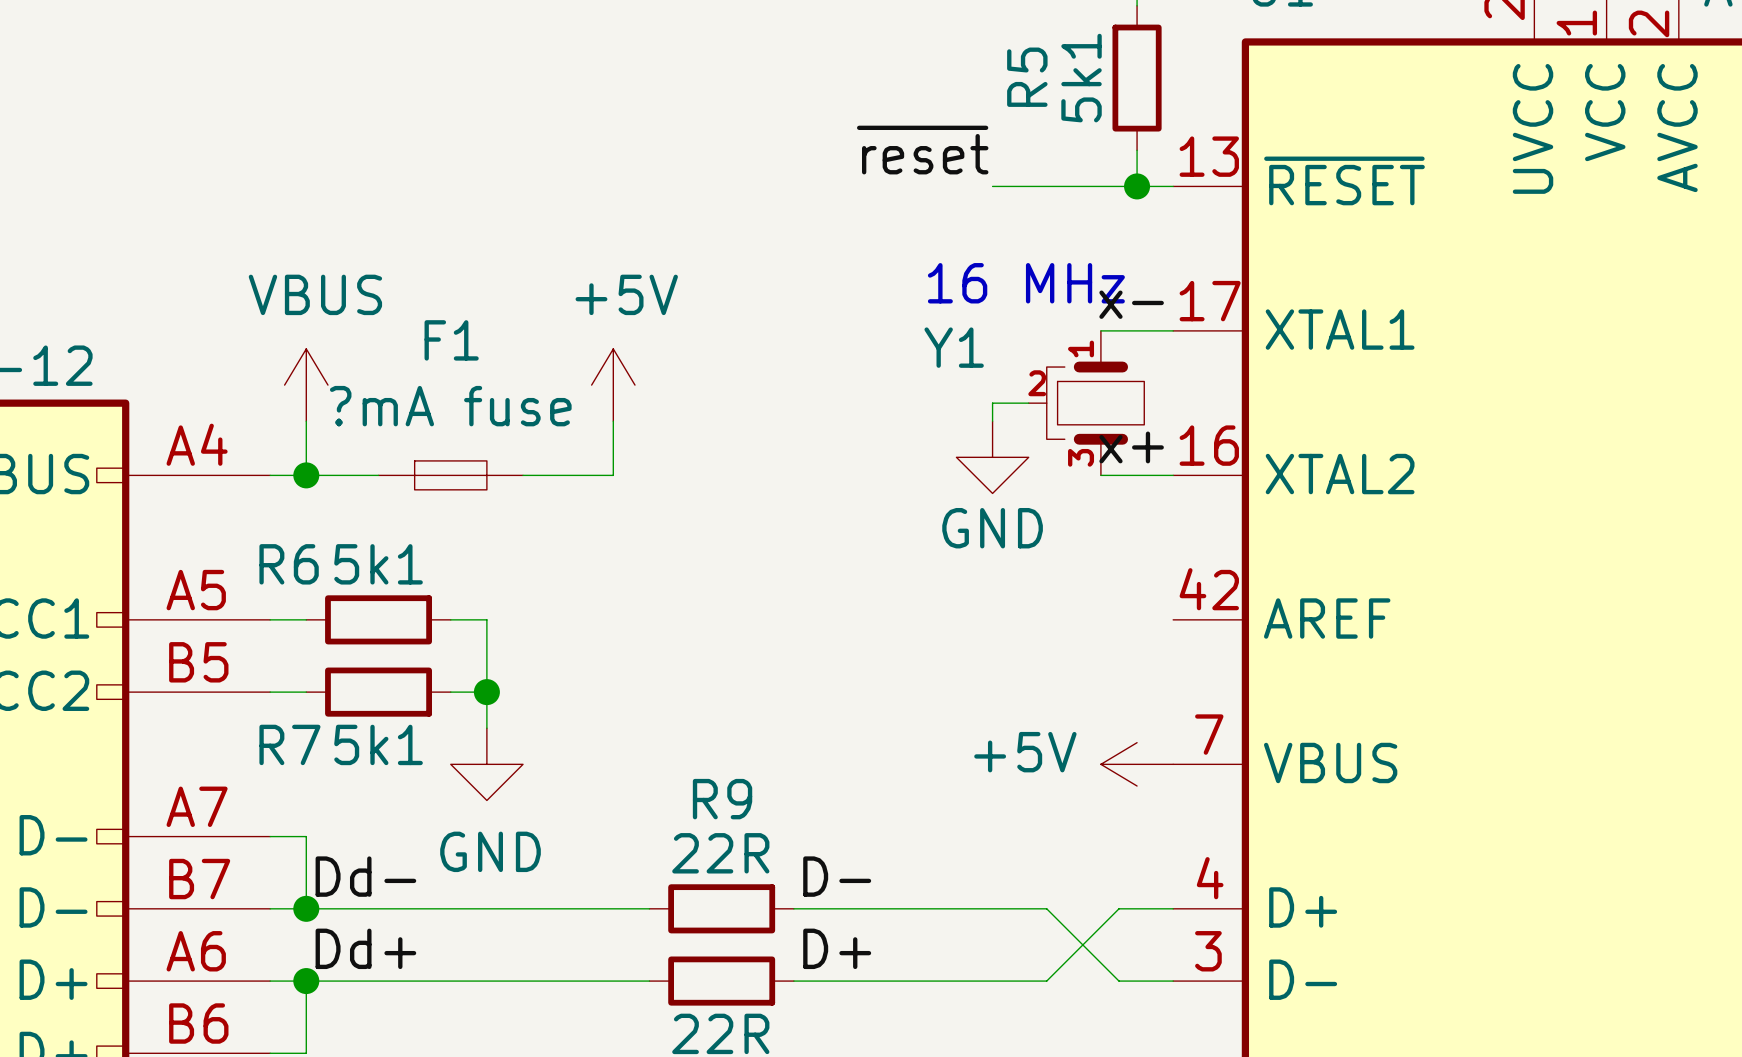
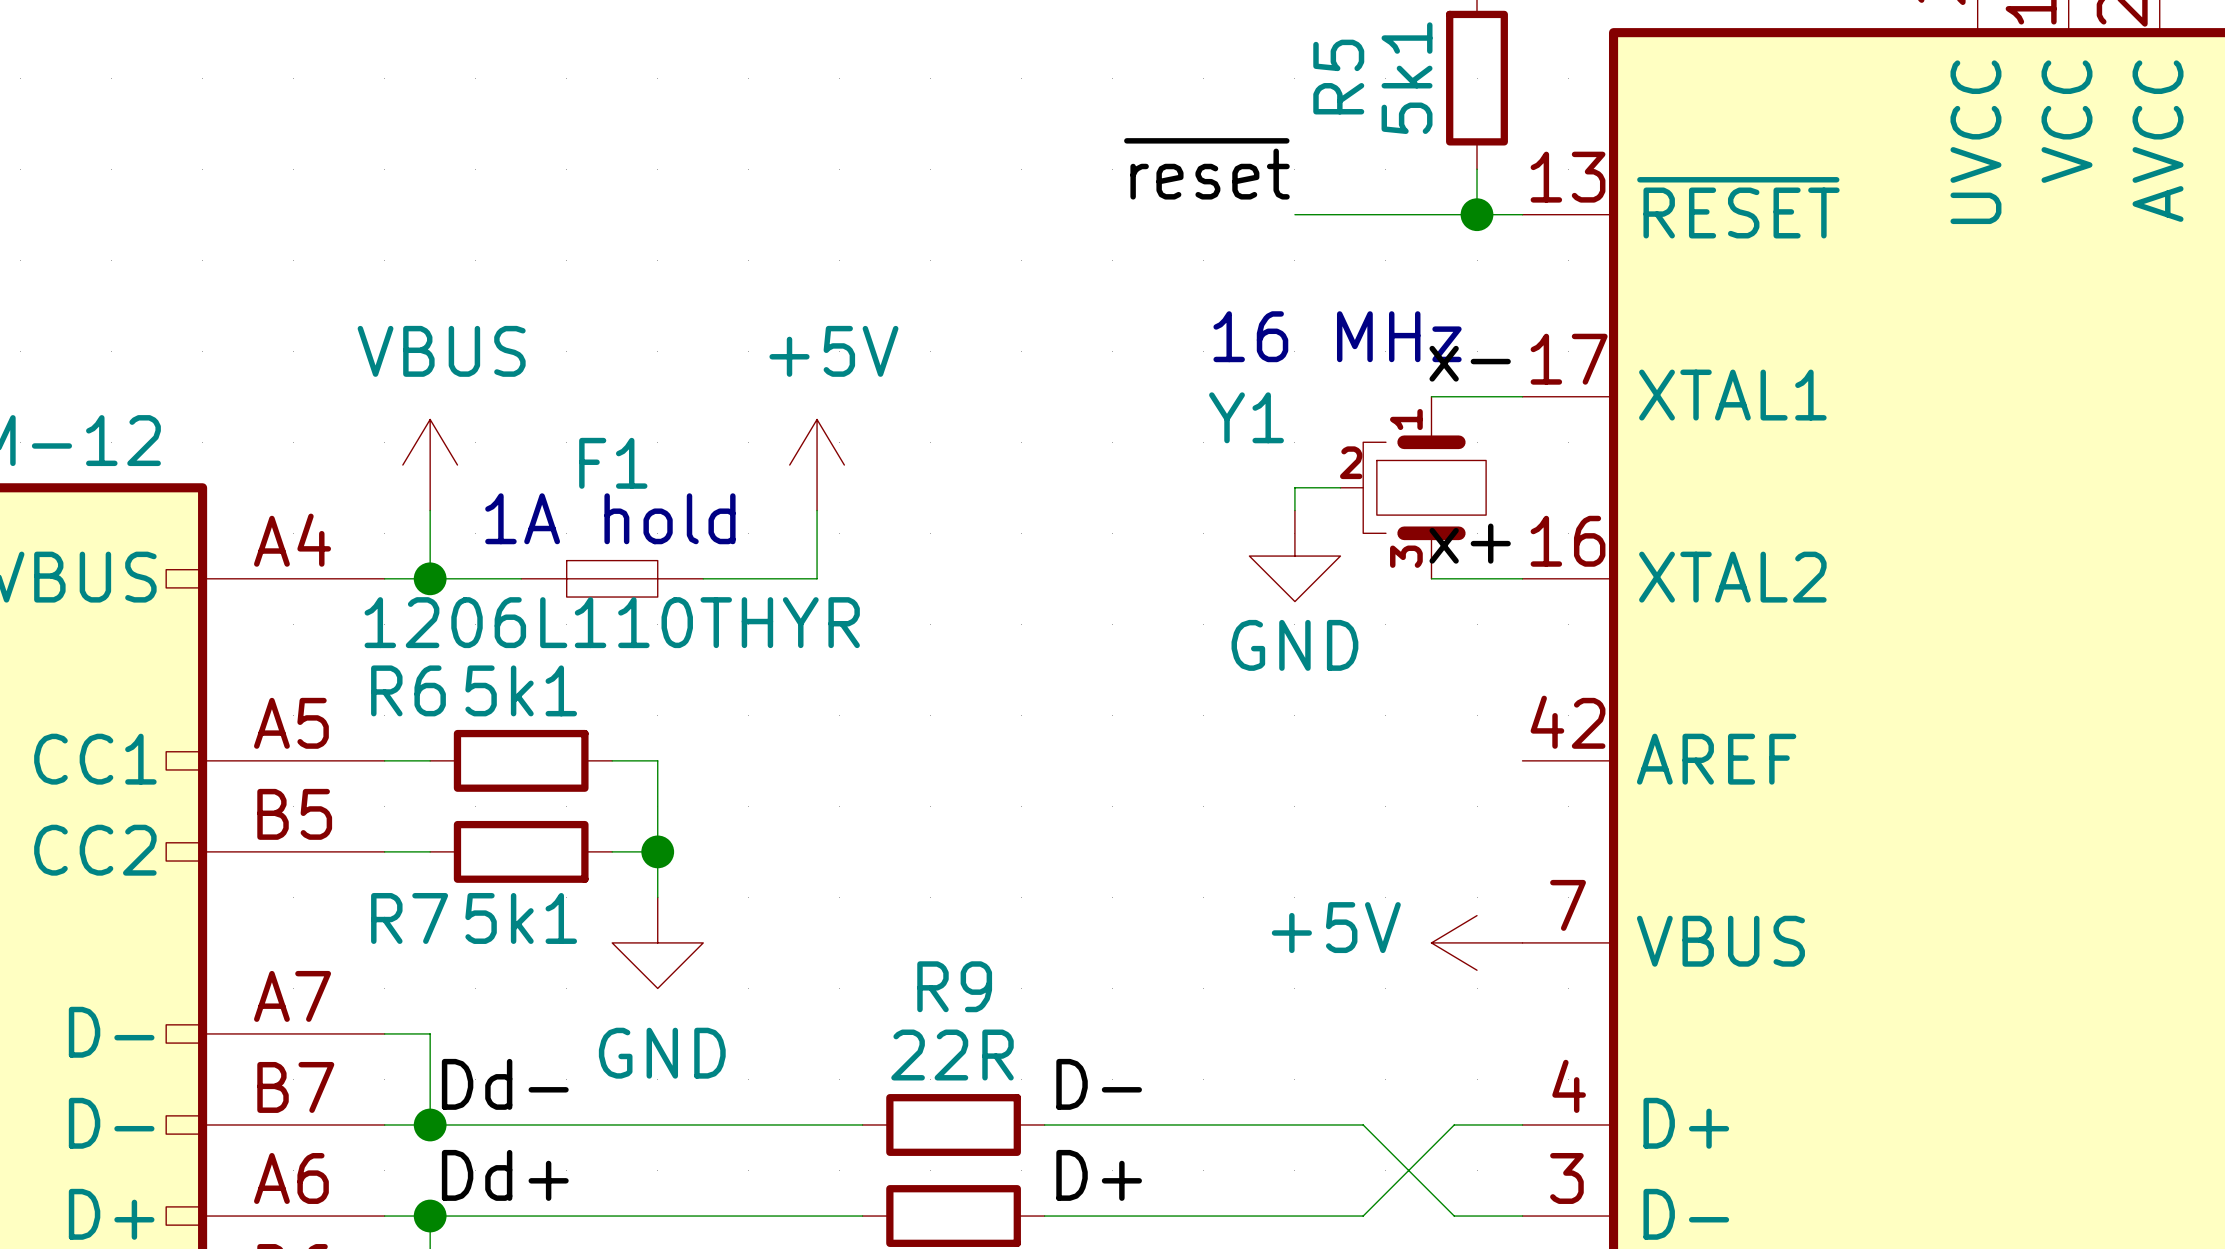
F1 name position: F1 (451, 340) -> F1 (613, 463)
F1 value: ?mA fuse (450, 406) -> 1206L110THYR (612, 622)
text: none -> 1A hold (610, 518)

